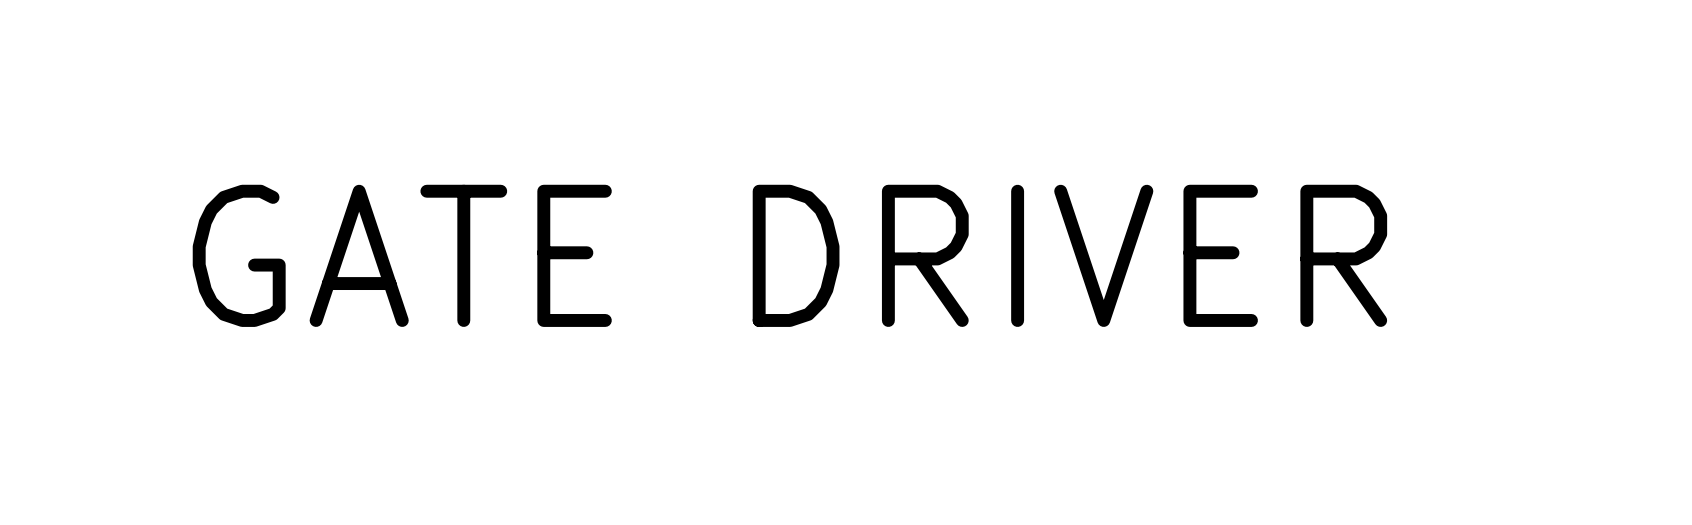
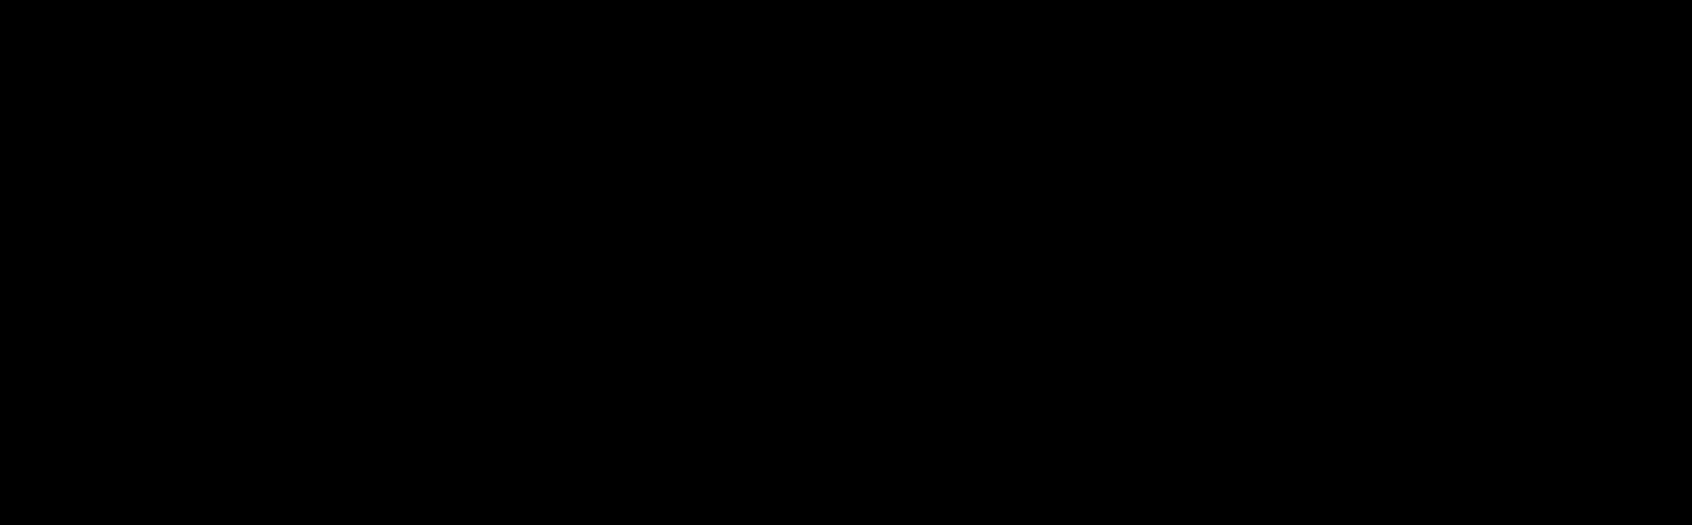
text: GATE DRIVER (789, 255) -> none

